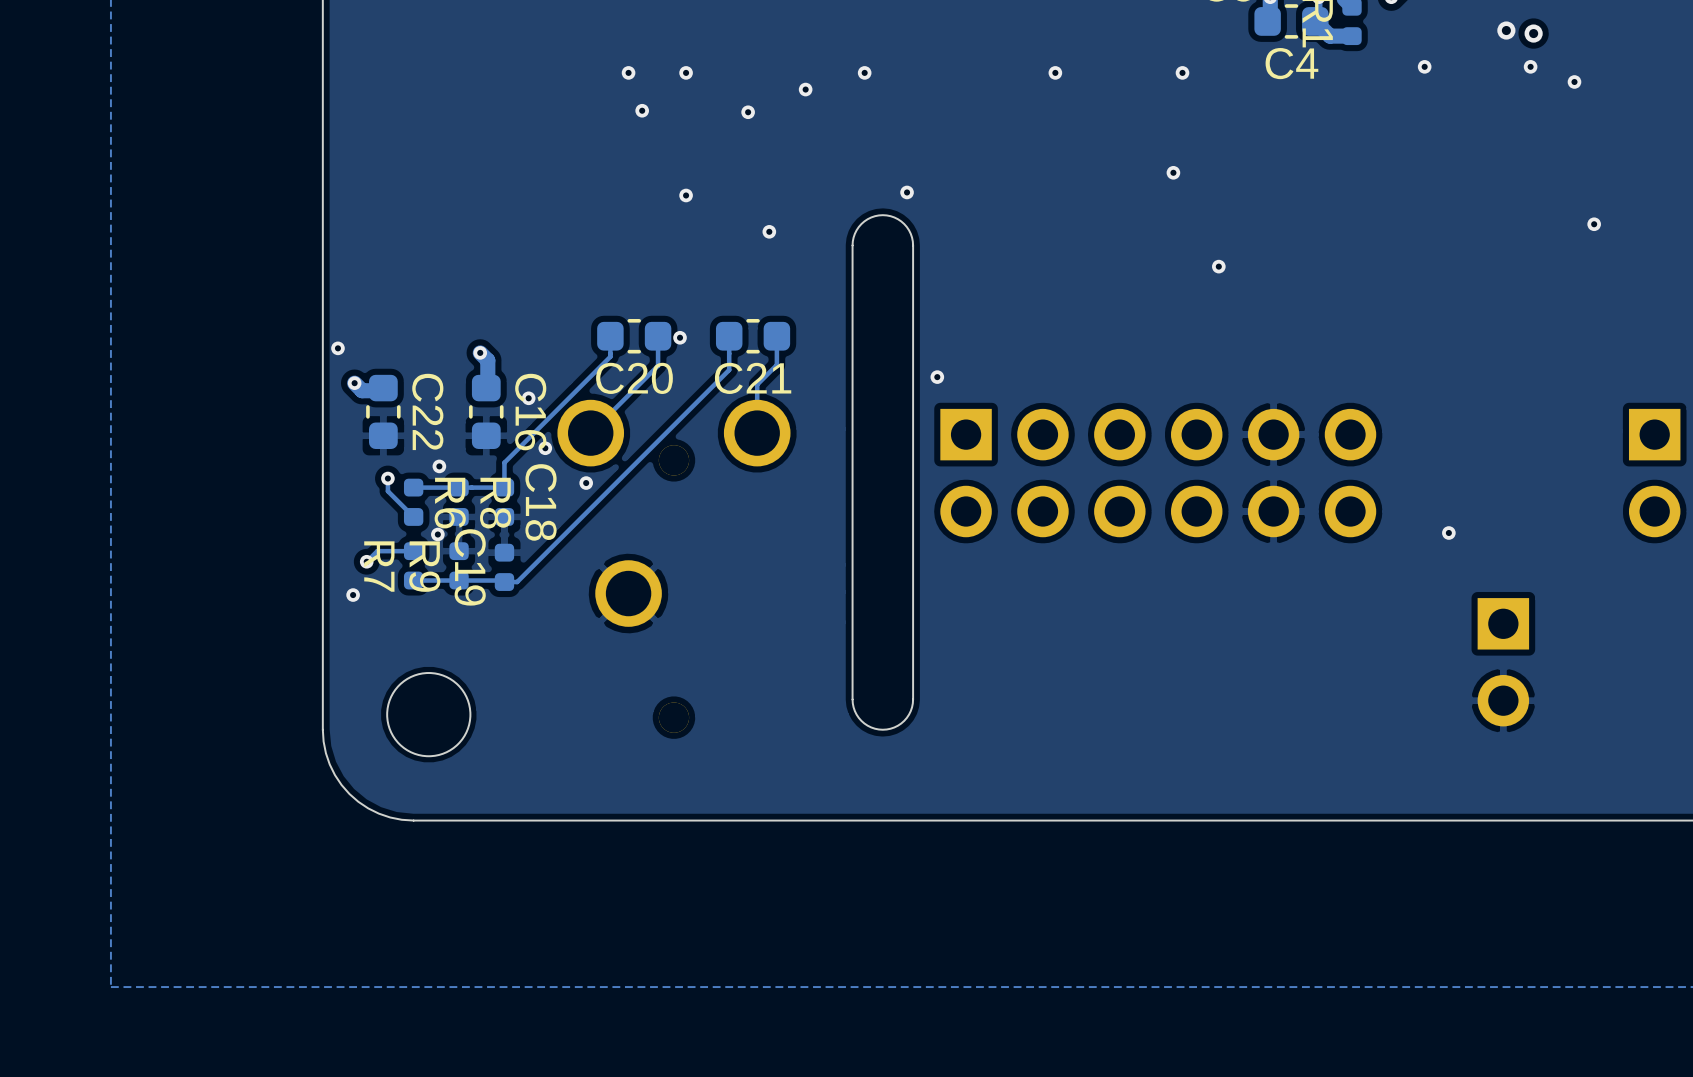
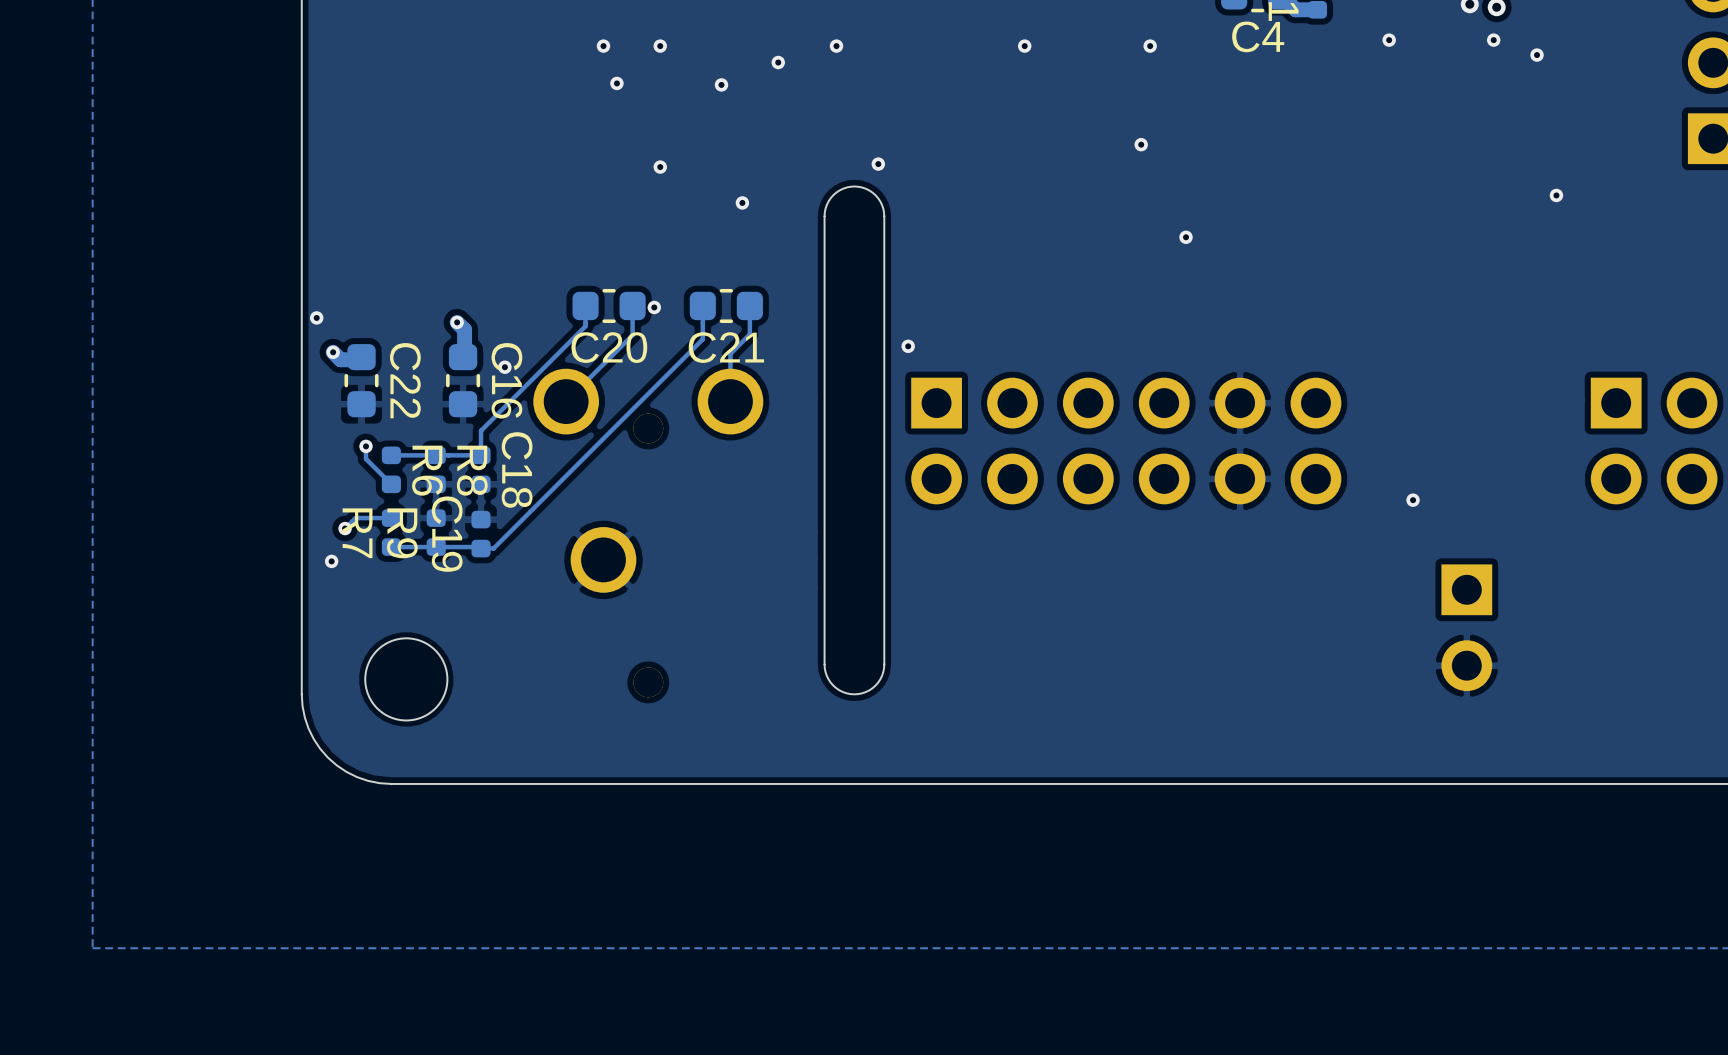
via: (545, 448) -> none
via: (439, 466) -> none
via: (586, 483) -> none
via: (437, 534) -> none

